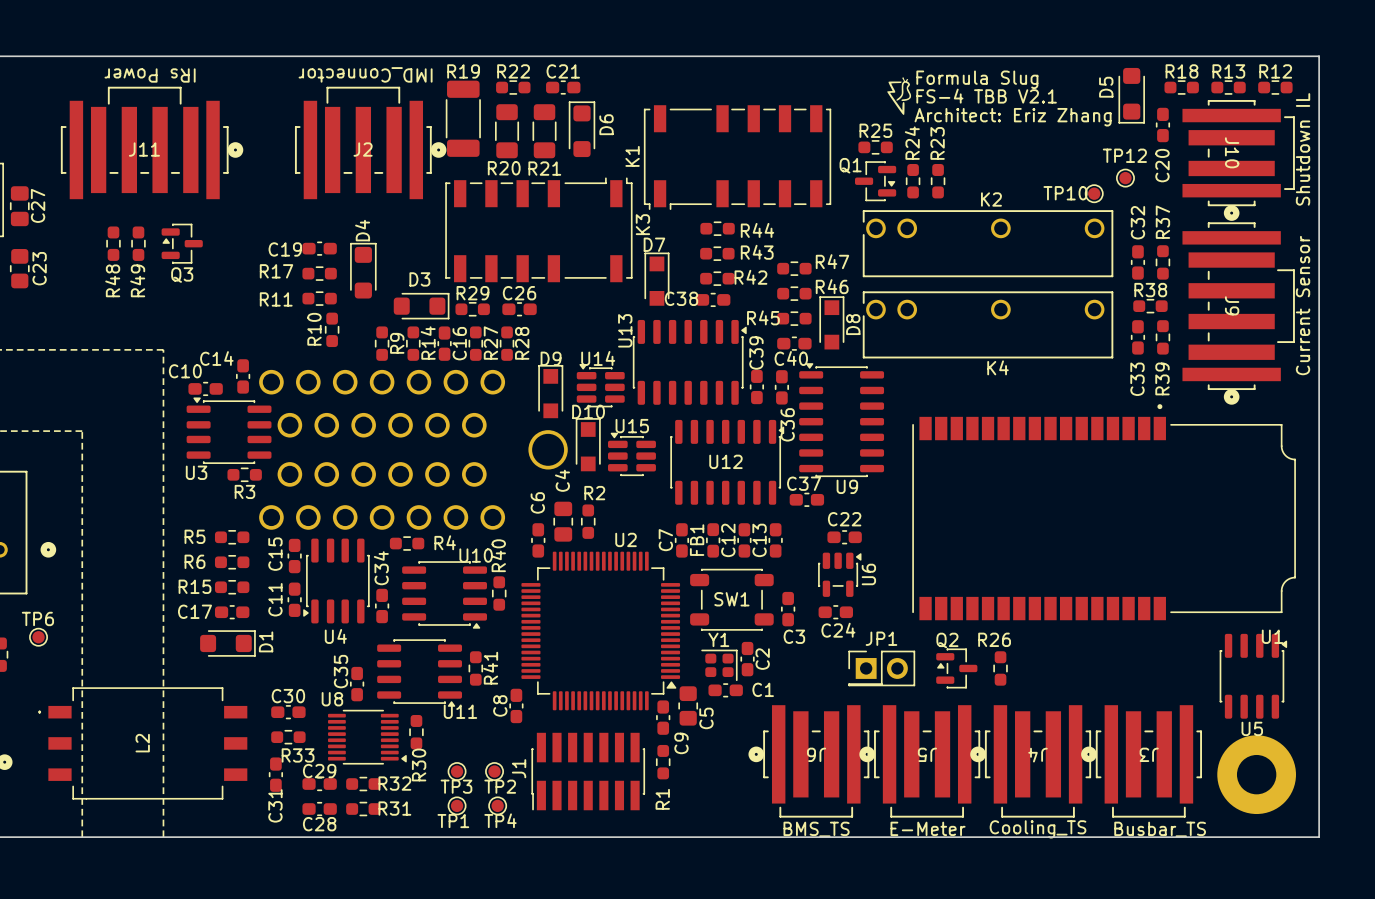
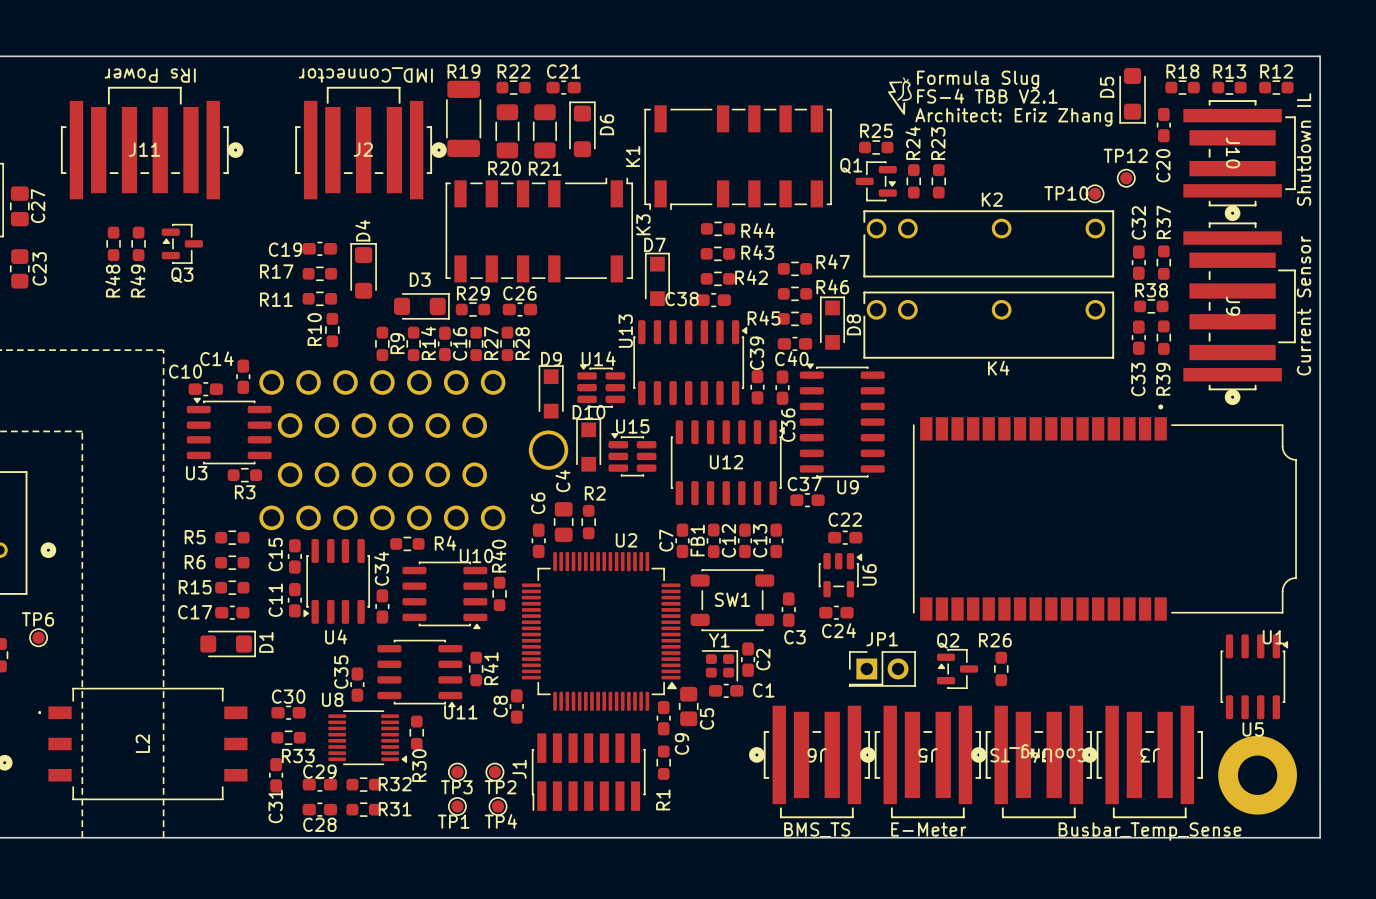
J4 value rotation: 0° (1038, 829) -> 180° (1038, 753)
J3 value: Busbar_TS (1160, 829) -> Busbar_Temp_Sense (1150, 831)

